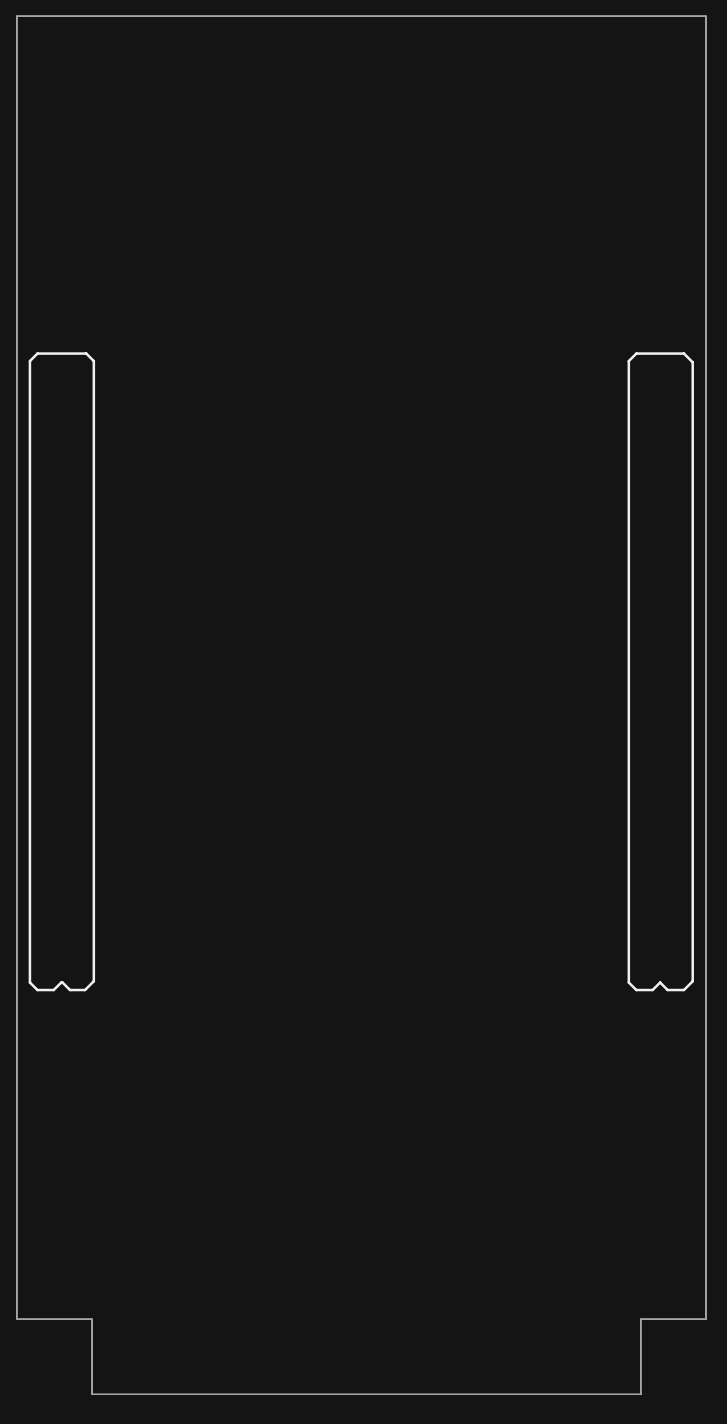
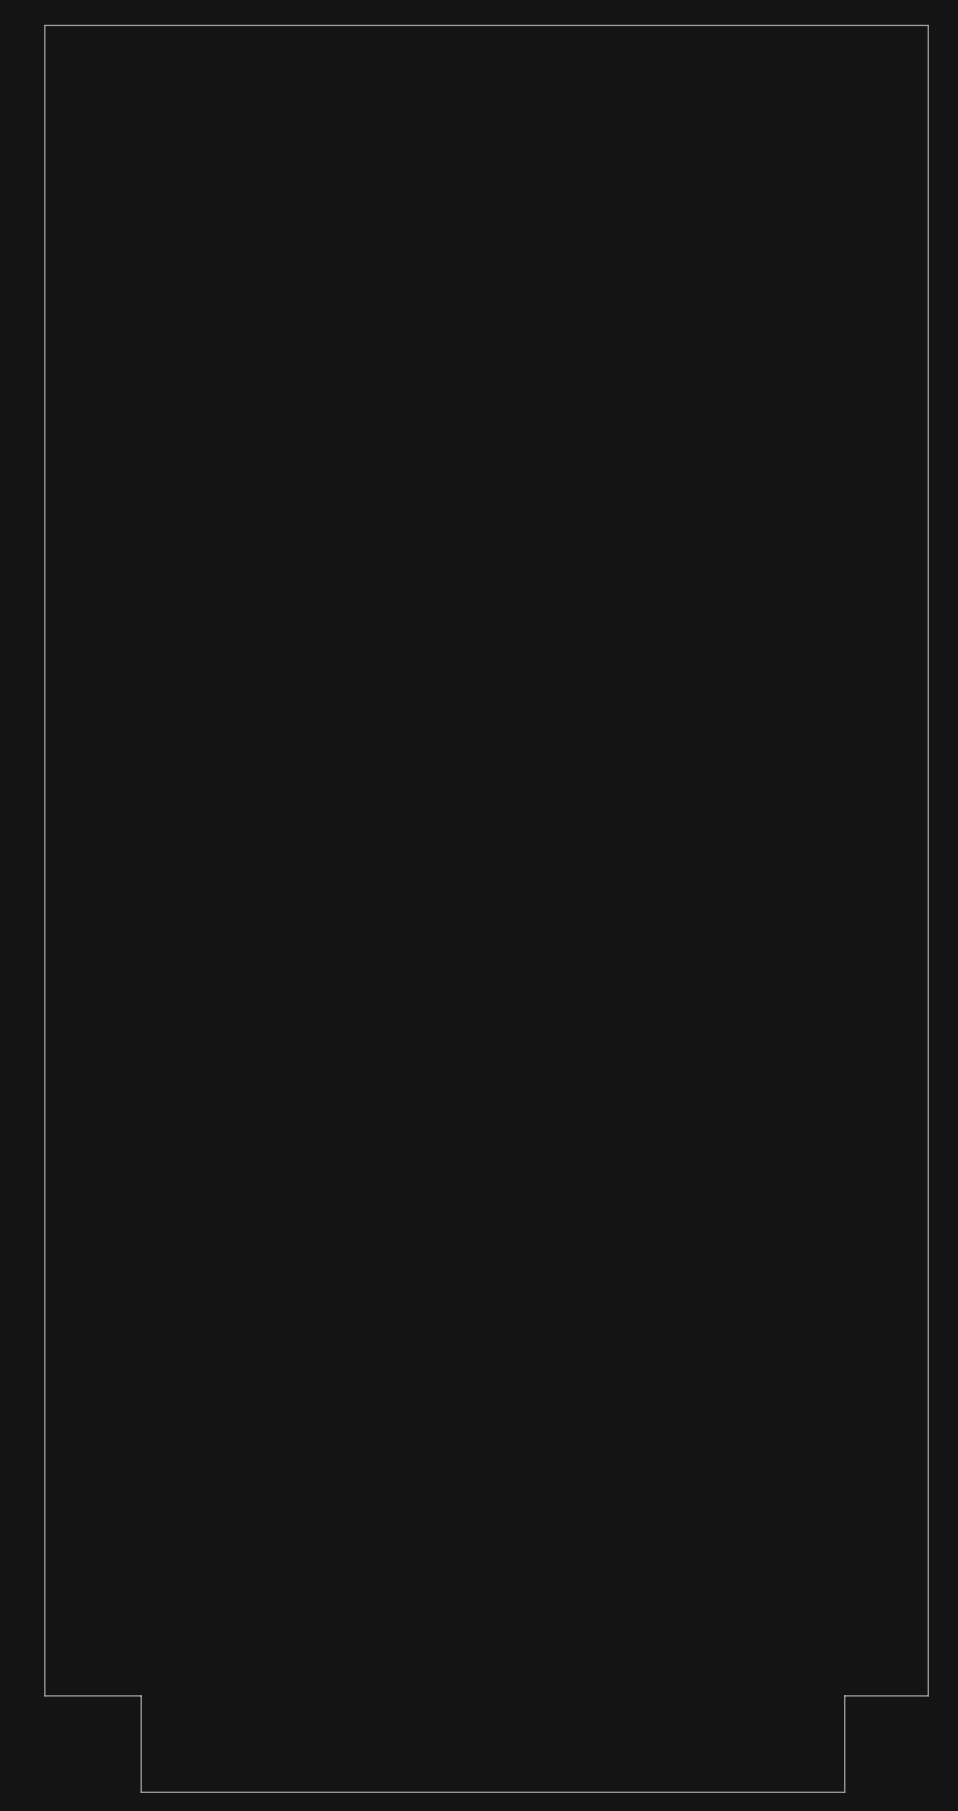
line: (16, 16) (706, 16) (706, 1319) (640, 1319) (640, 1394) (92, 1394) (92, 1319) (16, 1319) (16, 16) -> none
line: (37, 353) (86, 353) (93, 361) (93, 981) (85, 990) (70, 990) (62, 982) (53, 990) (37, 990) (29, 982) (29, 361) (37, 353) -> none
line: (636, 353) (683, 353) (692, 362) (692, 981) (683, 990) (667, 990) (660, 982) (652, 990) (636, 990) (628, 982) (628, 361) (636, 353) -> none

